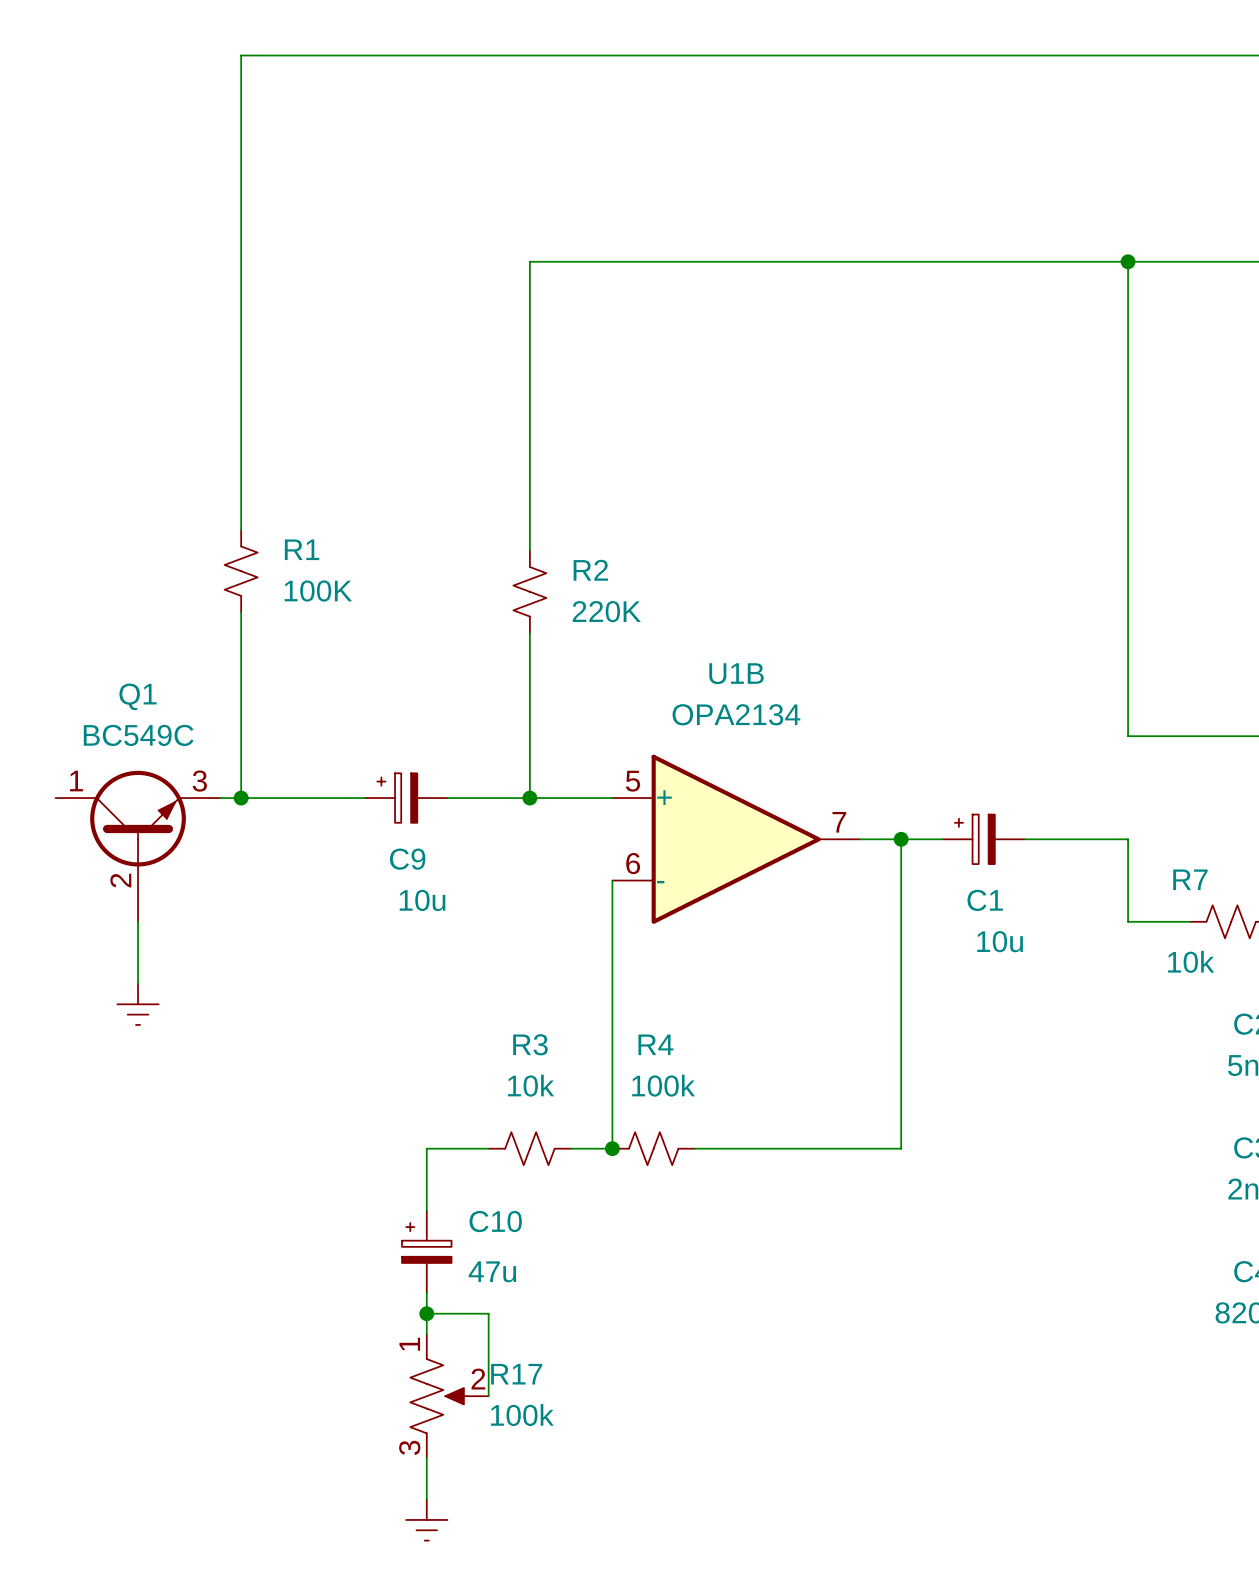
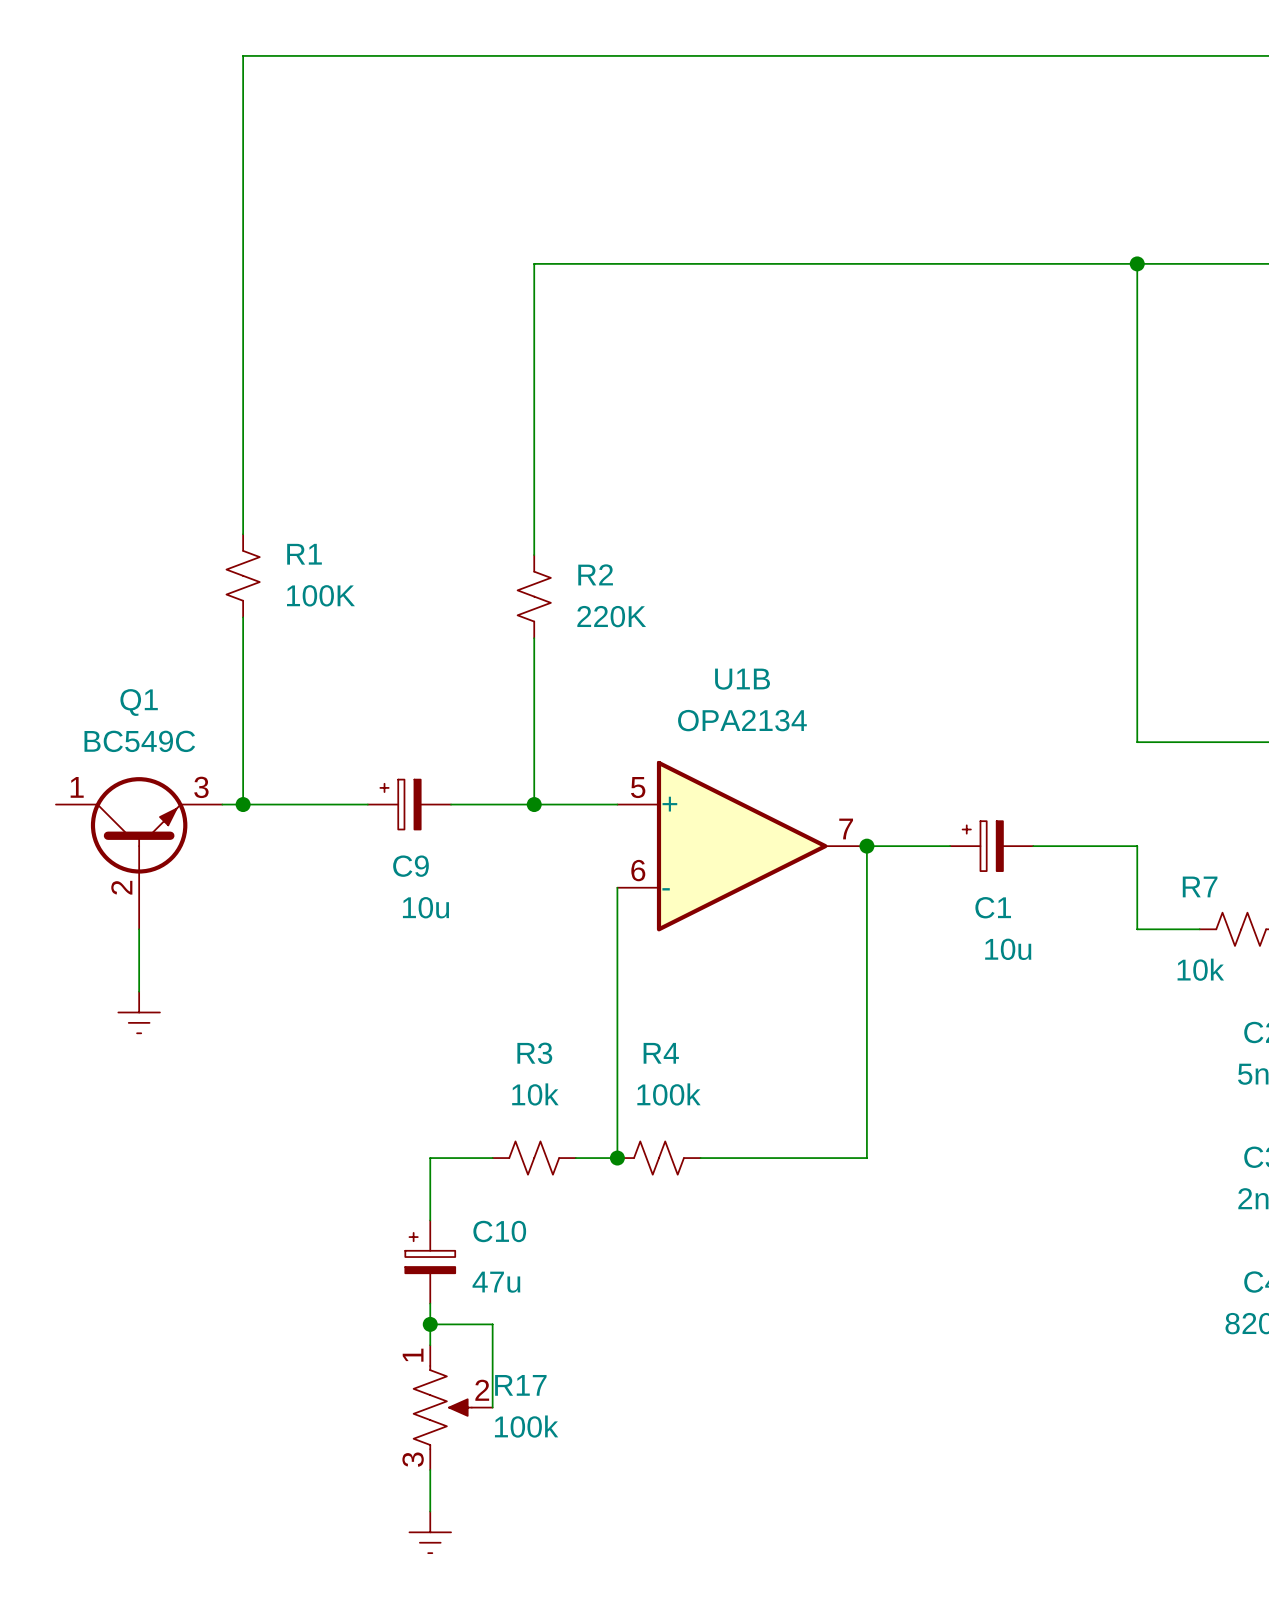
wire: (901, 839) (901, 1148) (859, 1148) -> (866, 846) (866, 1158)
junction position: (901, 839) -> (866, 846)

